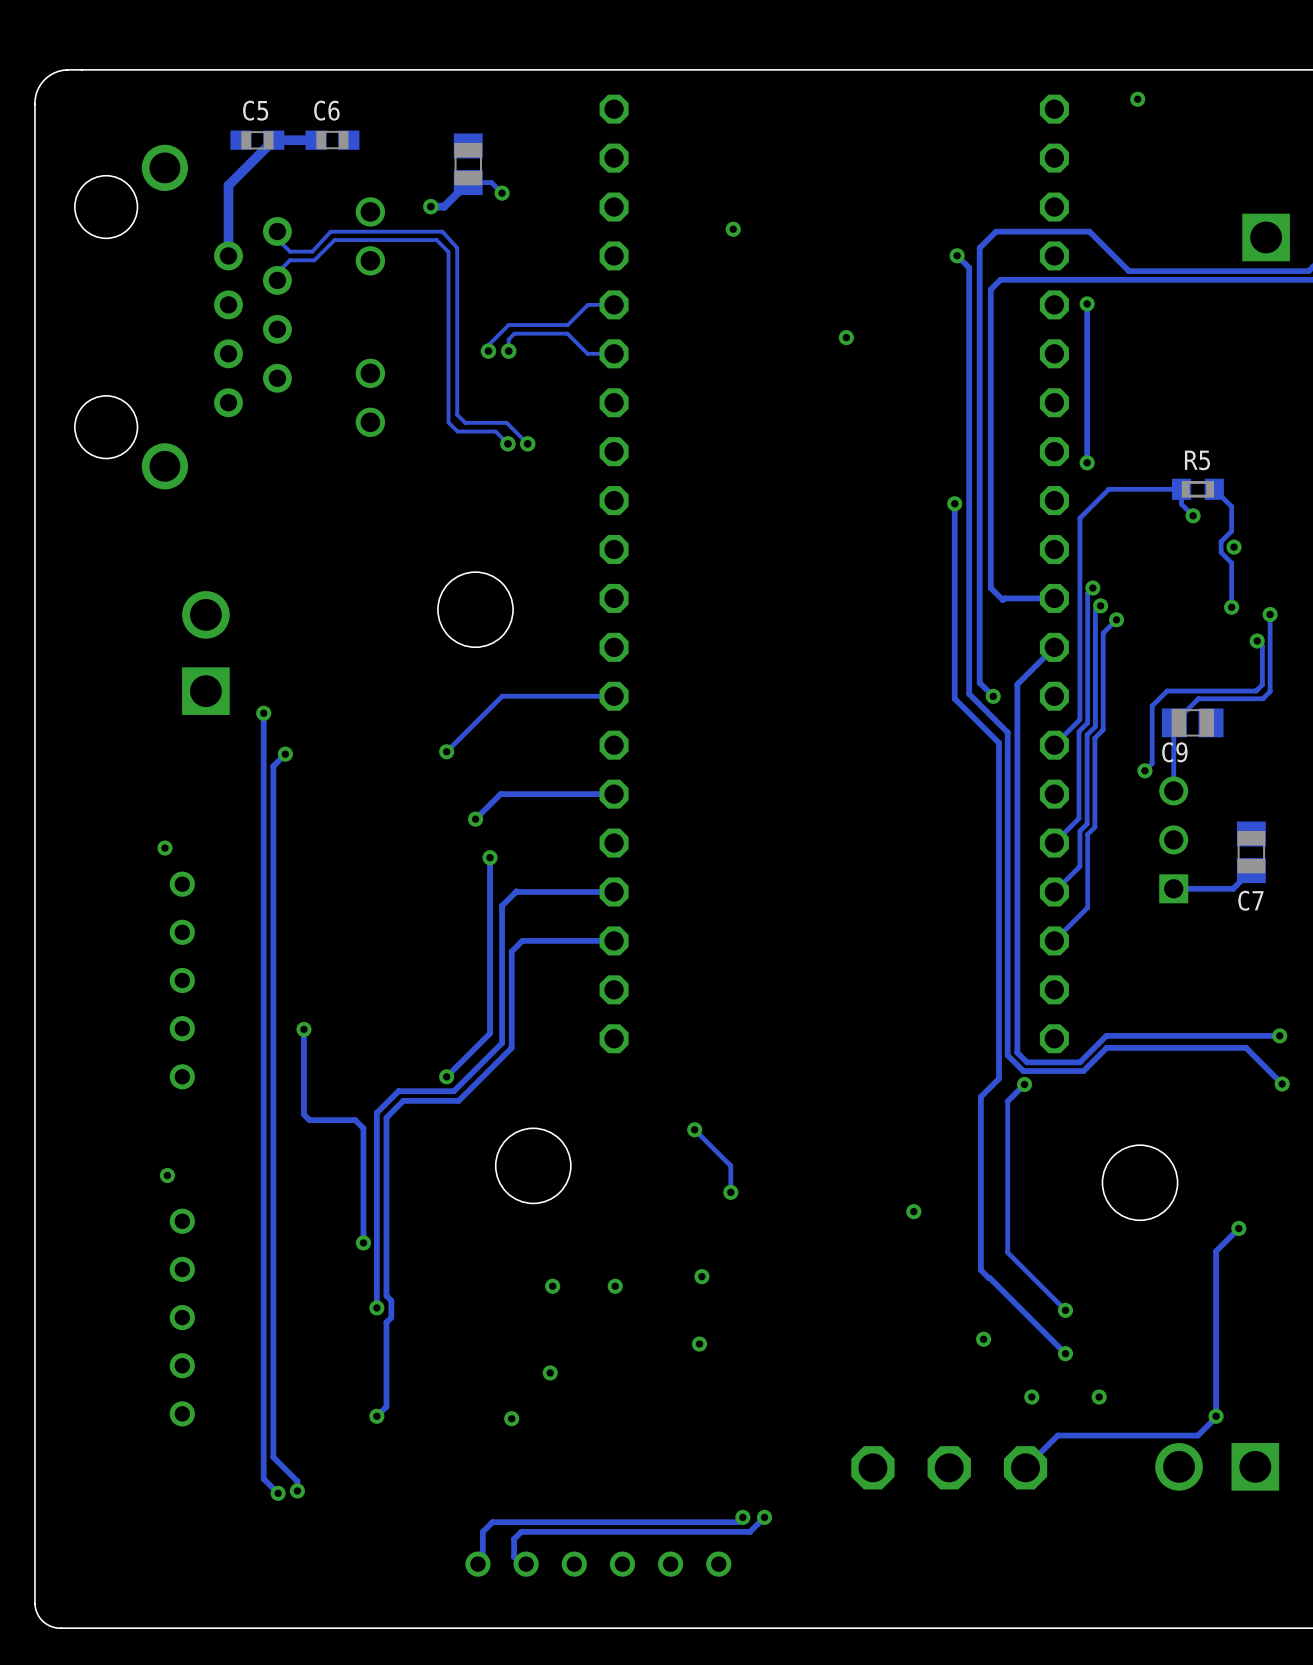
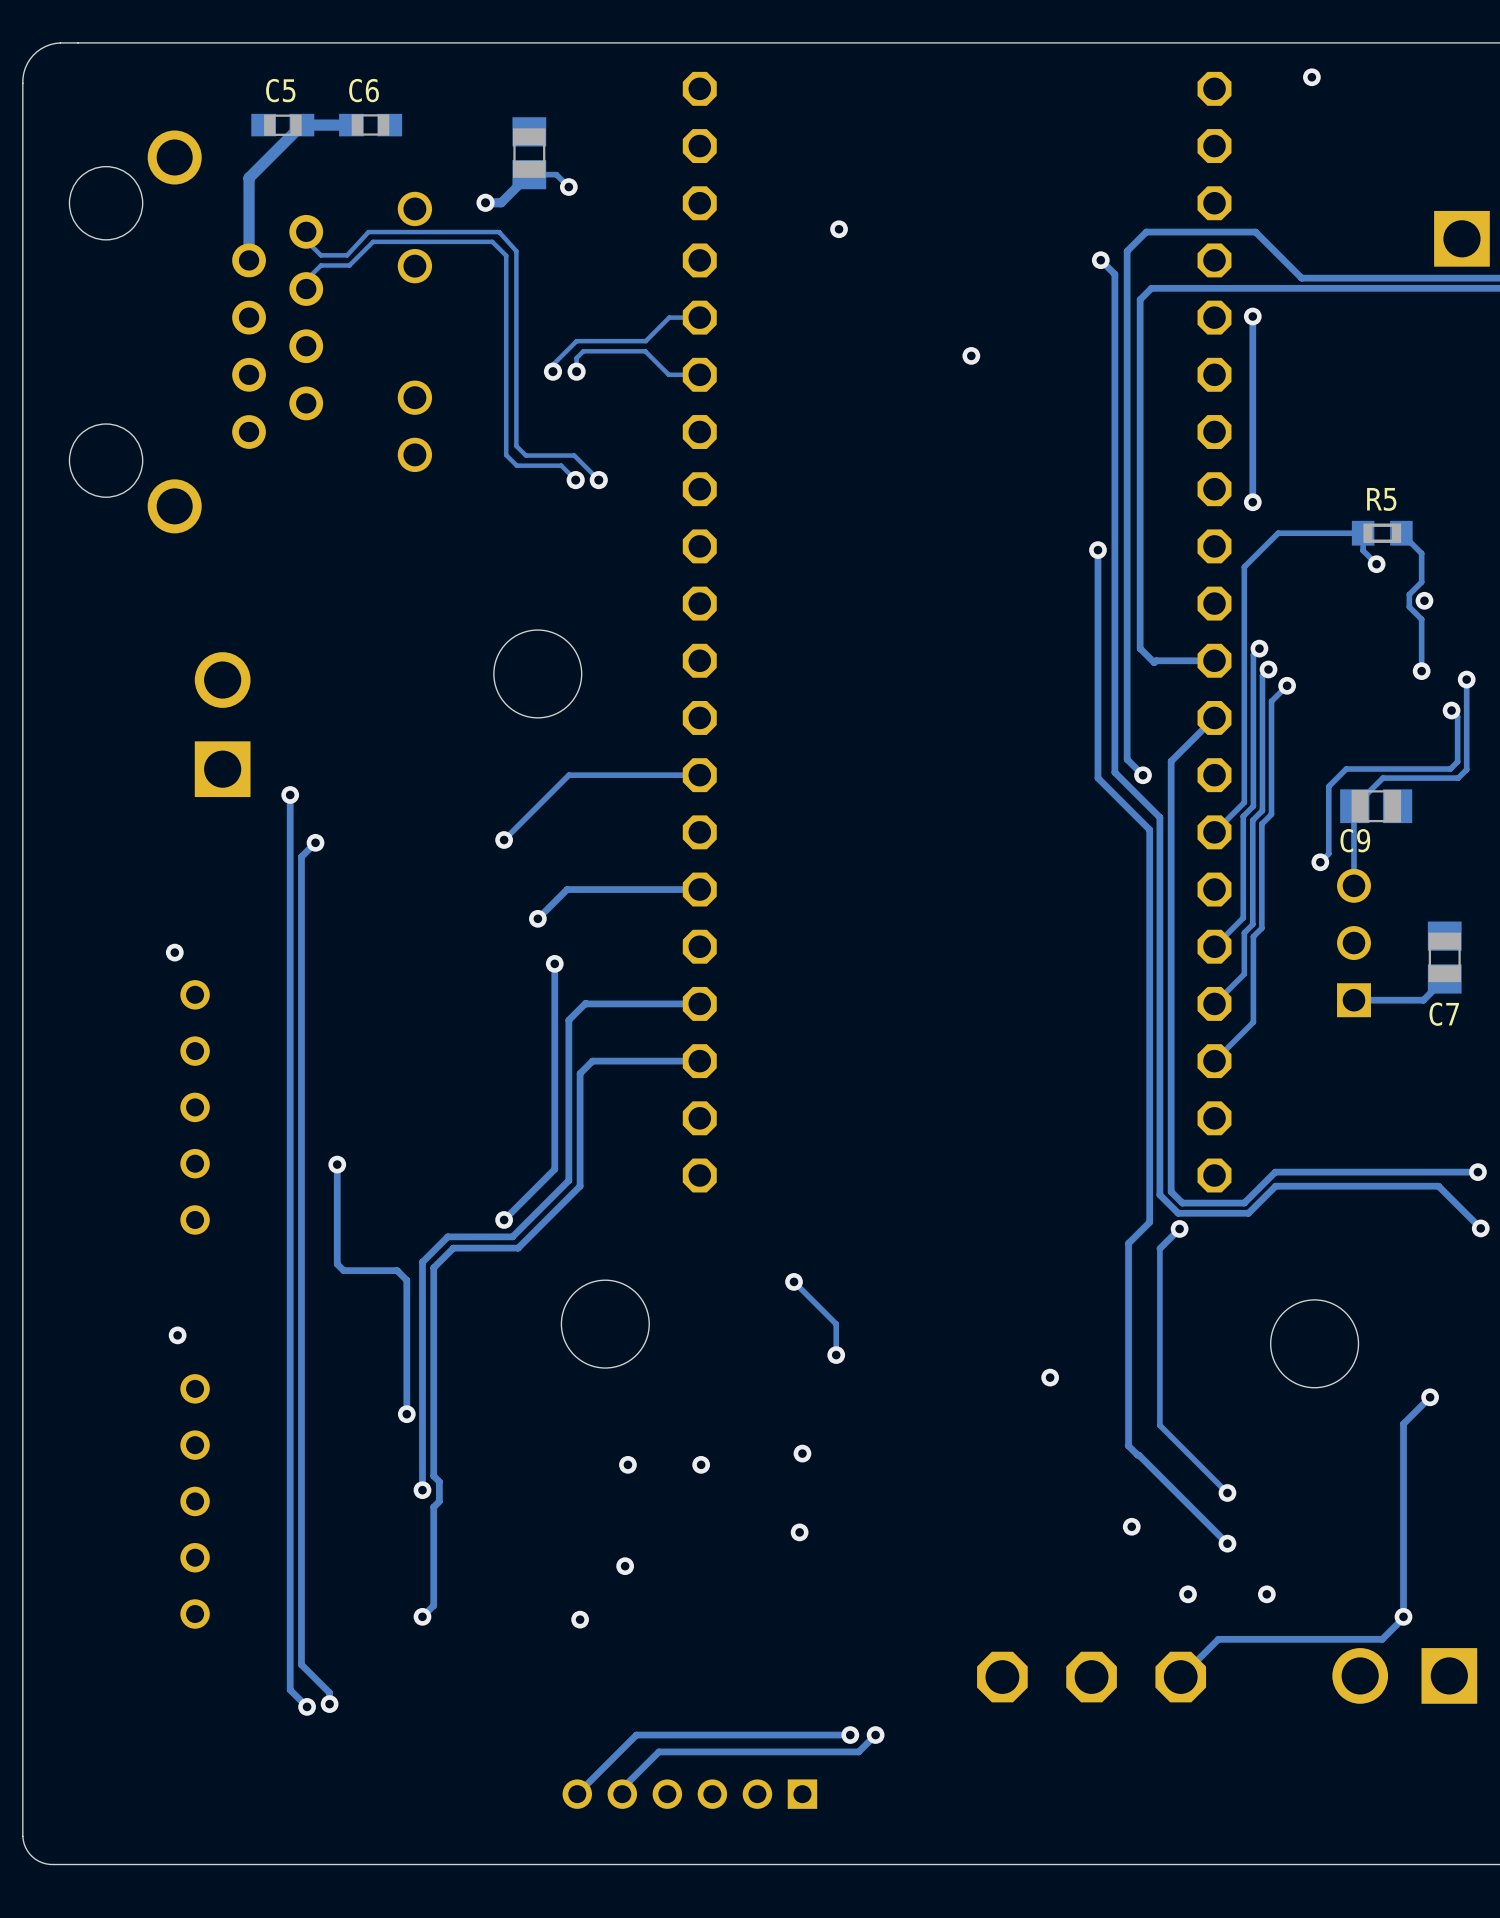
track: (742, 1517) (738, 1522) (492, 1522) (482, 1531) (482, 1564) (477, 1564) -> (850, 1735) (636, 1735) (577, 1794)
track: (579, 1531) (521, 1531) (514, 1539) (514, 1556) (521, 1564) (526, 1564) -> (658, 1751) (622, 1788) (622, 1794)
part footprint: [465, 1551, 732, 1577] -> [562, 1779, 818, 1809]

